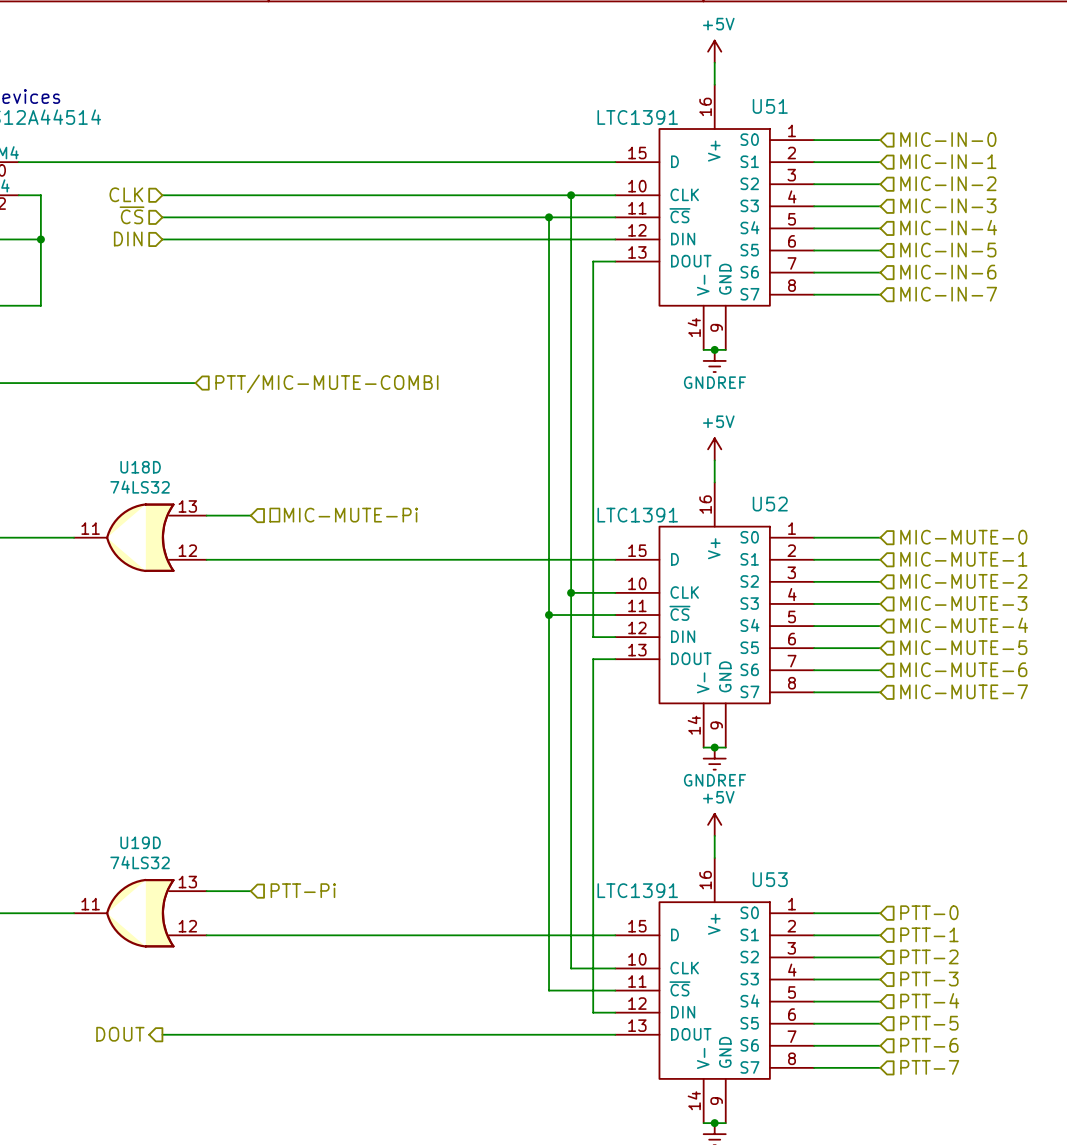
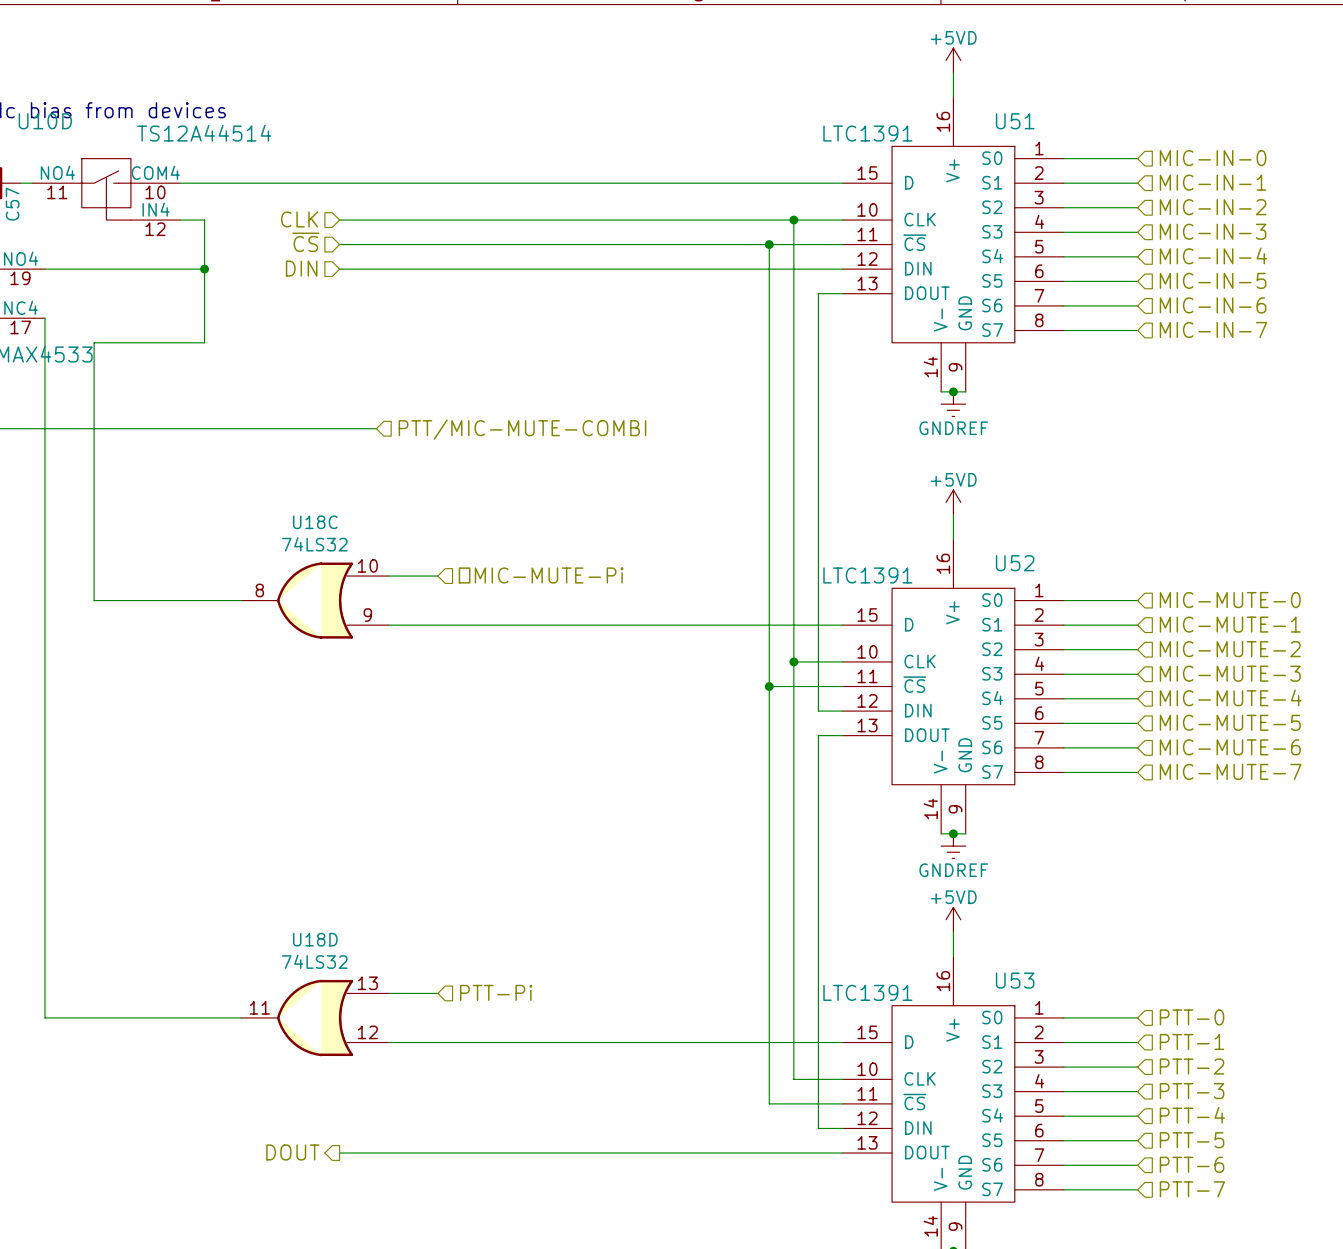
power symbol: +5V (714, 51) -> +5VD (953, 60)
power symbol: +5V (714, 449) -> +5VD (953, 502)
U18D name: U18D (140, 467) -> U18C (315, 522)
U18D pin number: 13 (187, 506) -> 10 (367, 565)
U18D pin number: 11 (90, 528) -> 8 (259, 590)
U18D pin number: 12 (187, 550) -> 9 (367, 615)
power symbol: +5V (714, 824) -> +5VD (953, 919)
U19D name: U19D (140, 842) -> U18D (315, 939)

